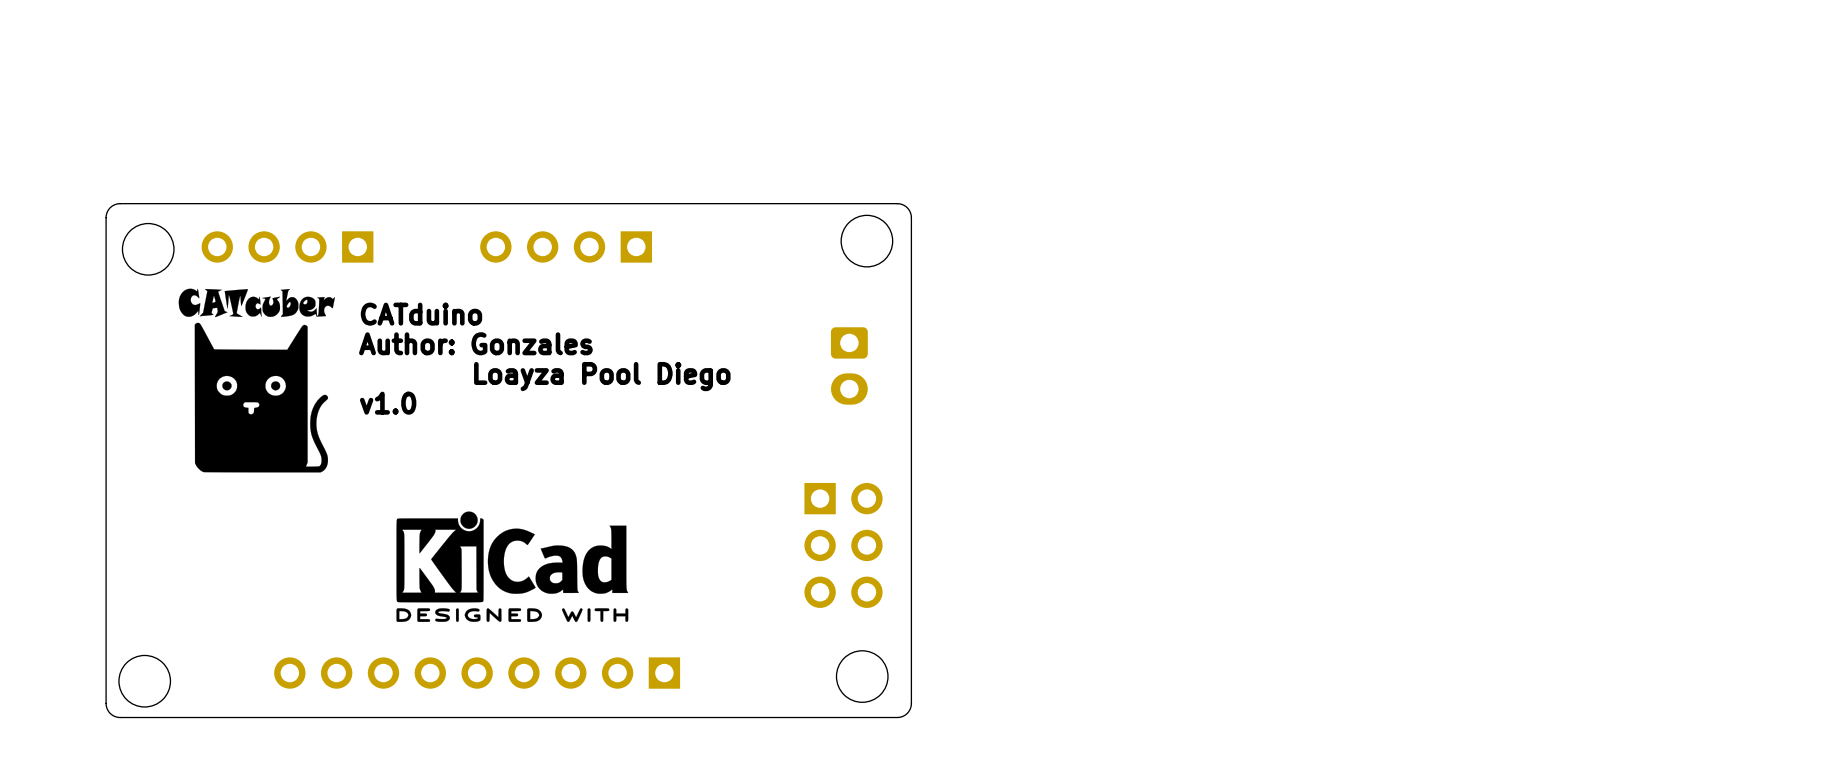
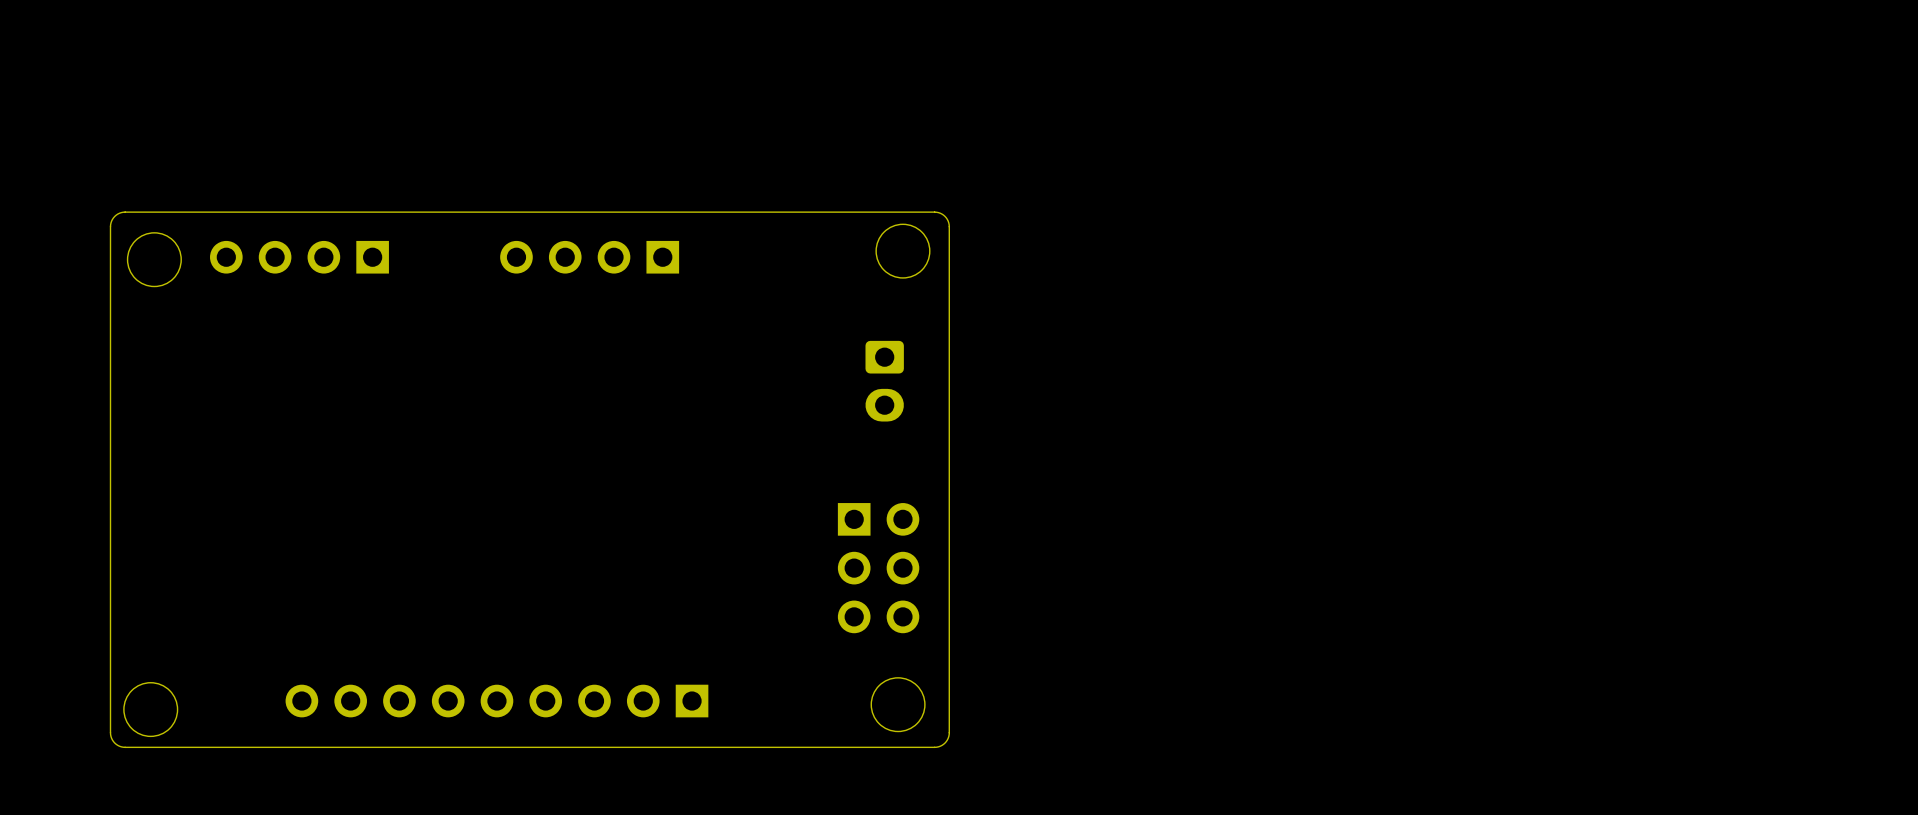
drawing: [178, 288, 335, 473] -> none
text: CATduino (421, 314) -> none
text: Author: Gonzales (475, 343) -> none
text: Loayza Pool Diego (602, 376) -> none
text: v1.0 (388, 403) -> none
drawing: [396, 511, 629, 622] -> none

